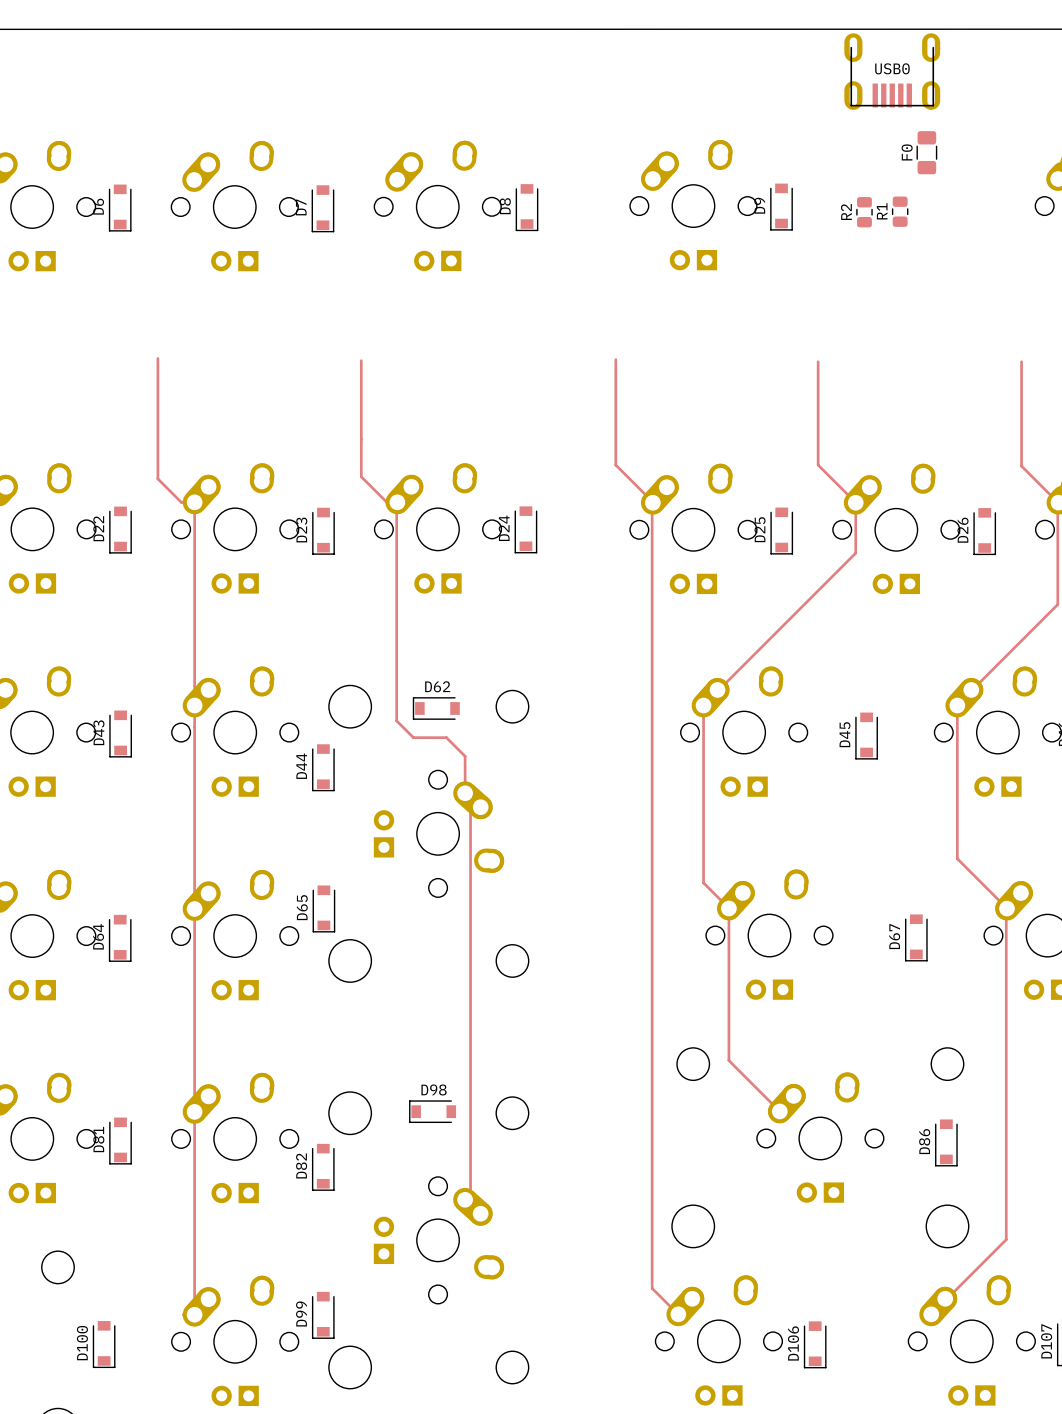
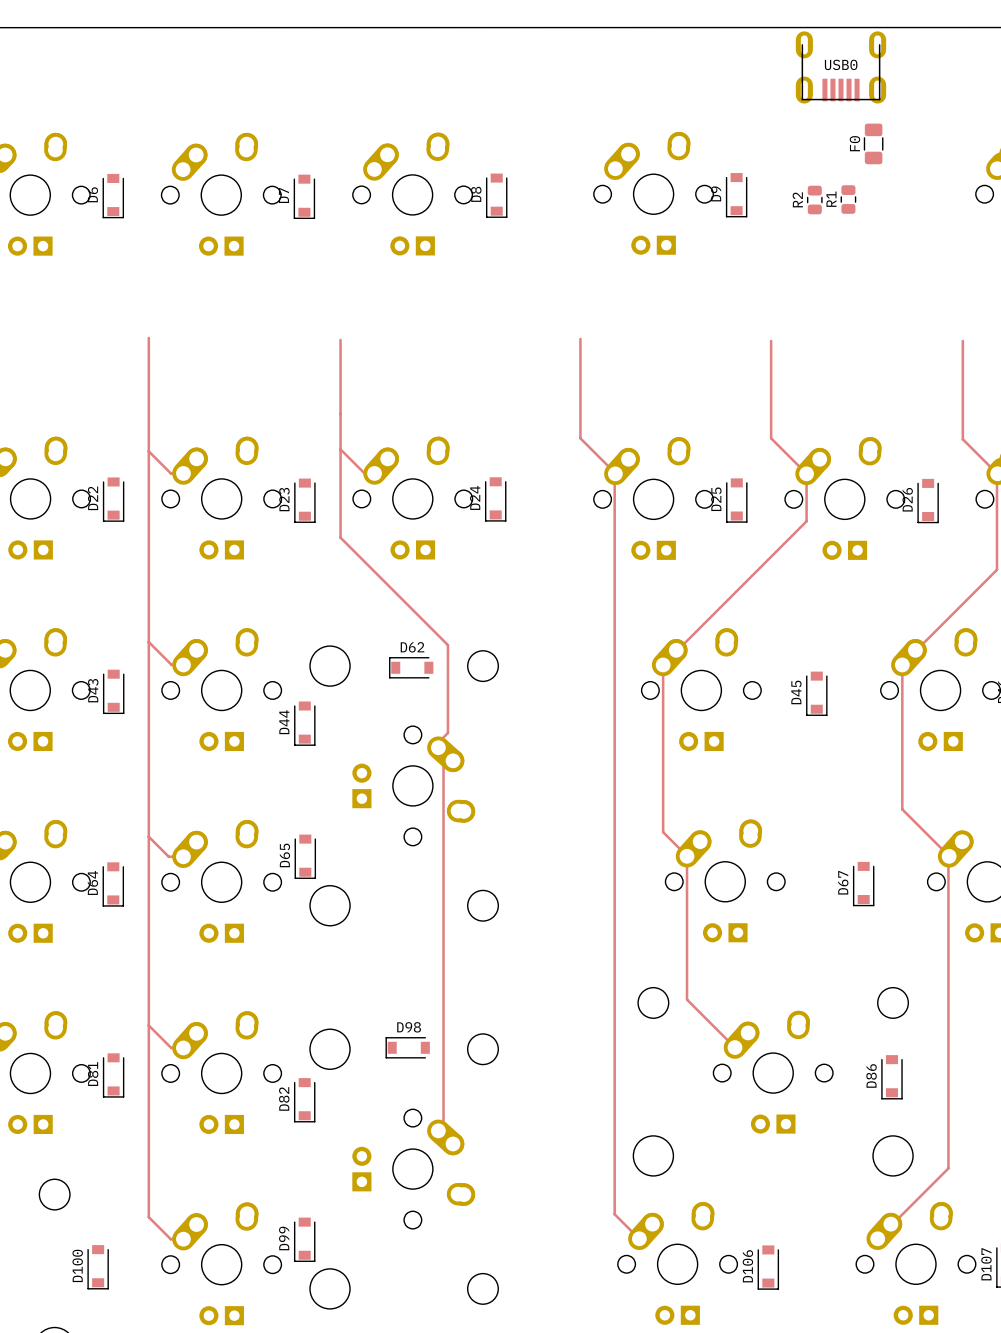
track: none -> (148, 451) (148, 1217) (172, 1239)
track: (194, 502) (194, 1314) -> none
track: (397, 502) (396, 720) (413, 737) (446, 737) (465, 756) (465, 787) -> (340, 449) (340, 537) (447, 645) (447, 733) (438, 742)
track: none -> (148, 642) (171, 664) (183, 664)
track: none -> (148, 836) (168, 856) (183, 856)
track: none -> (148, 1025) (171, 1047) (183, 1047)

